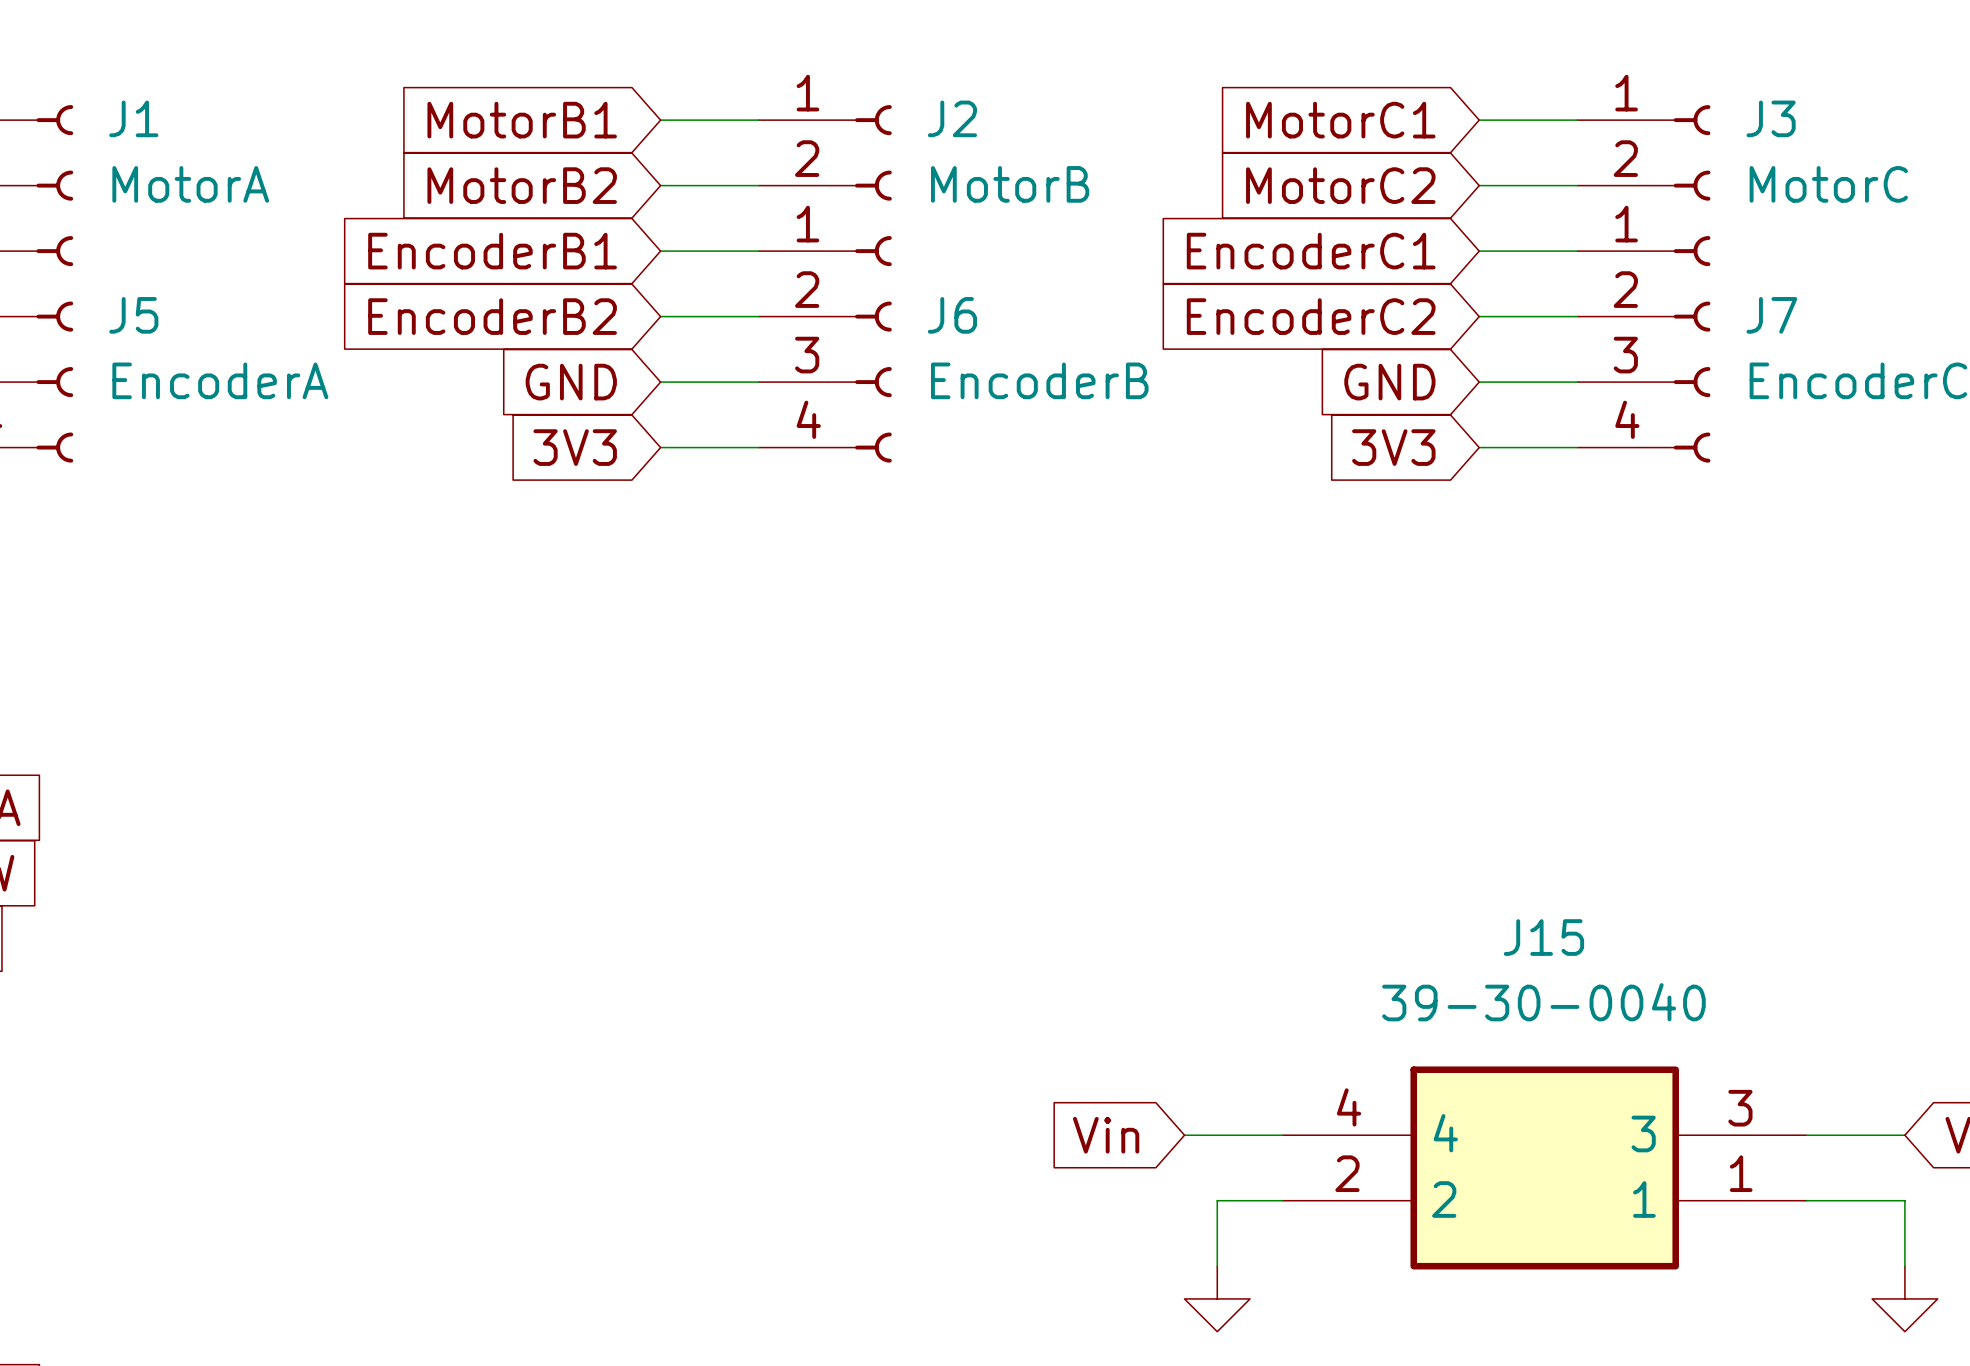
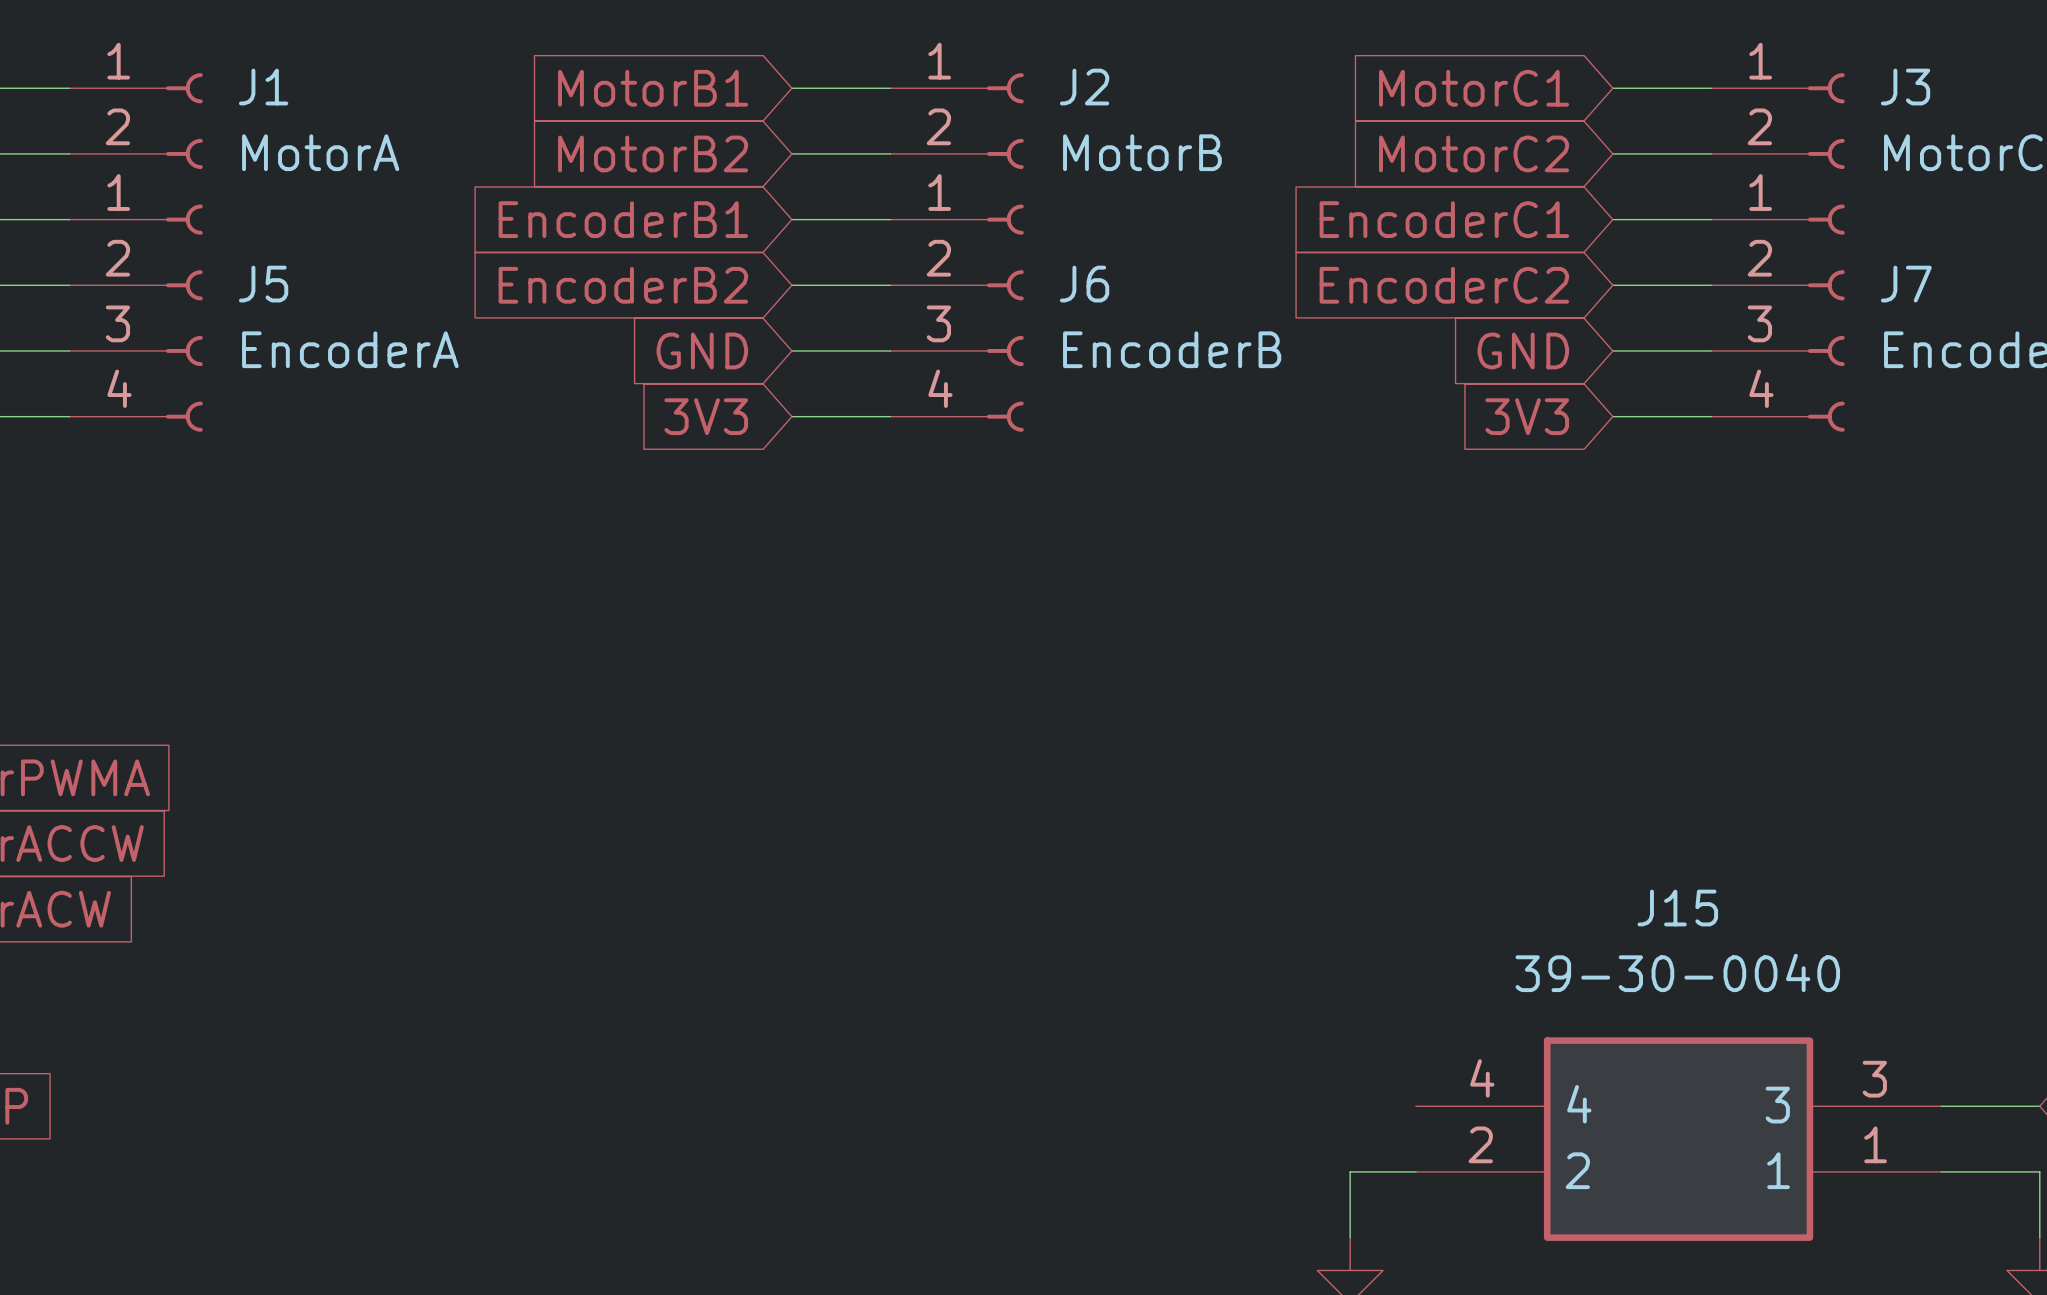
global label: Vin (1106, 1135) -> none
wire: (1184, 1135) (1282, 1135) -> none

